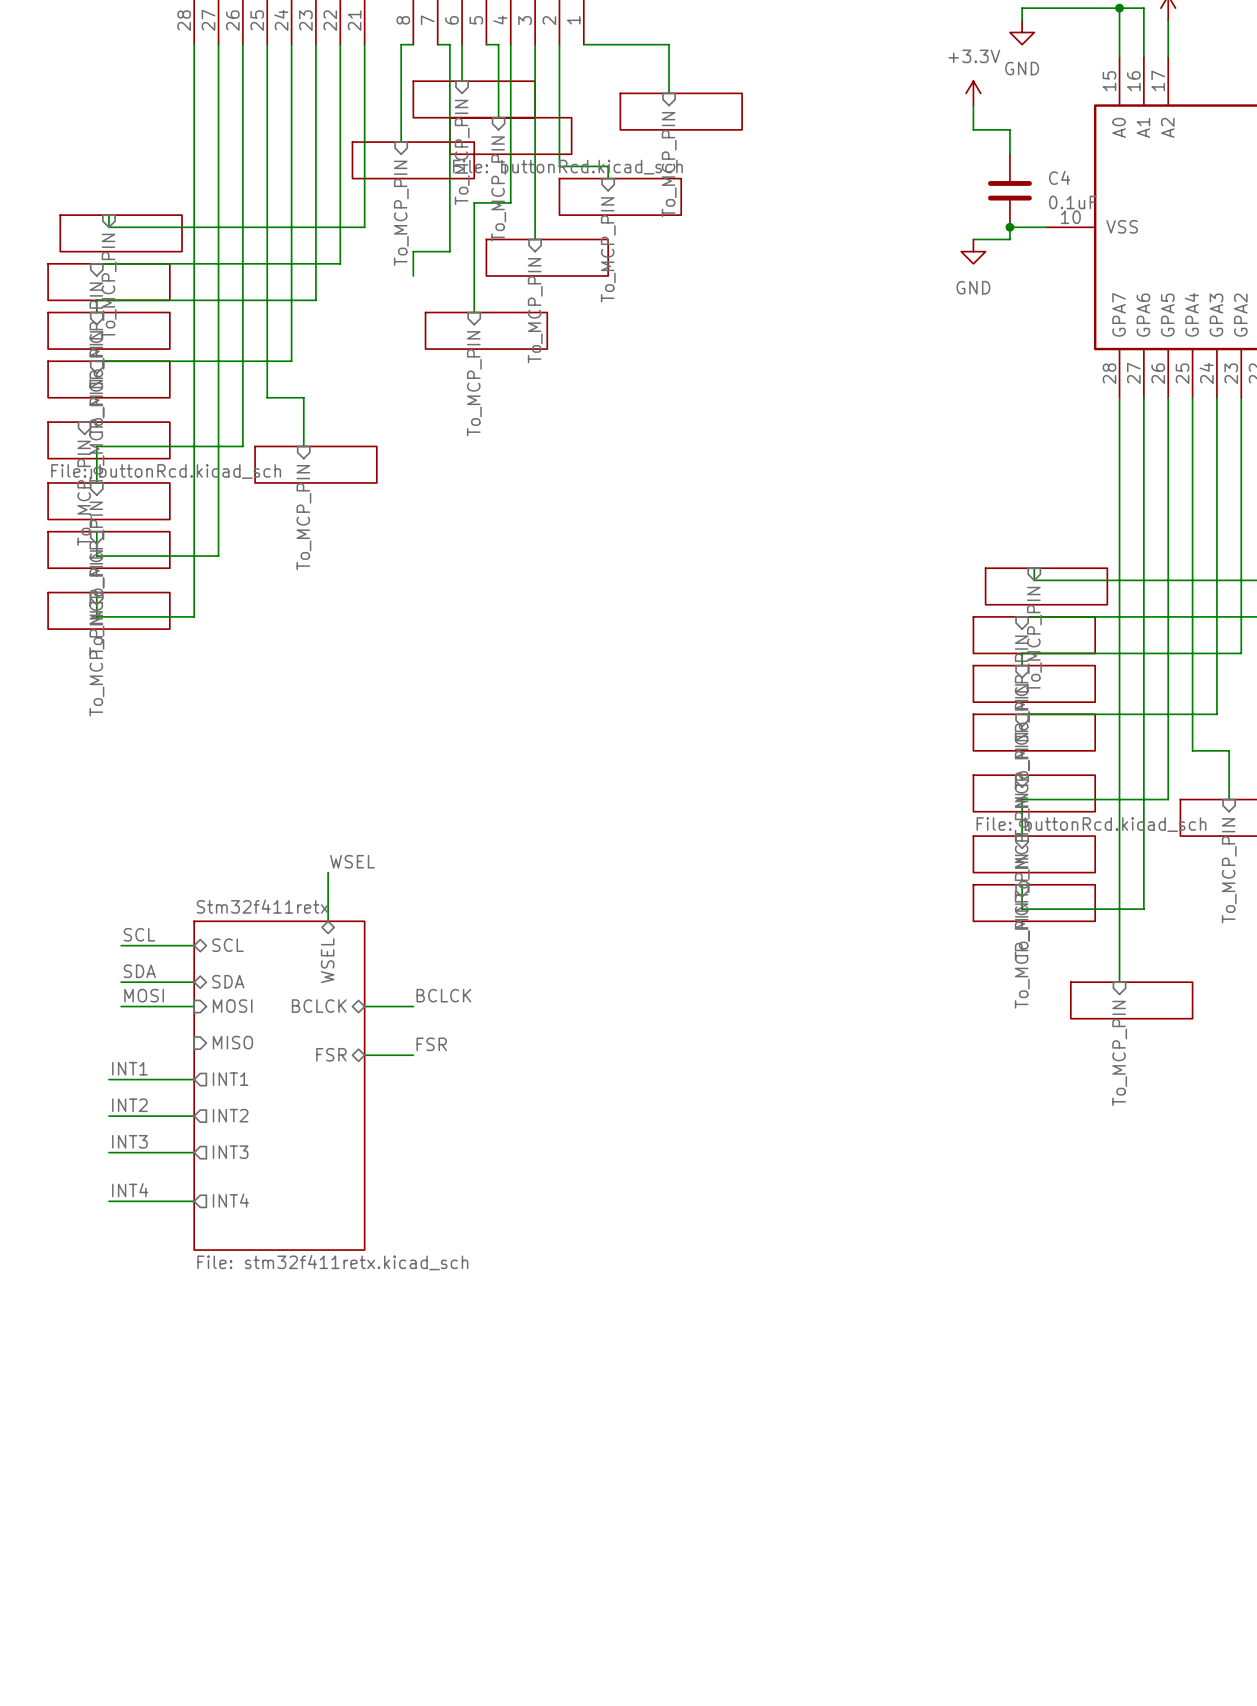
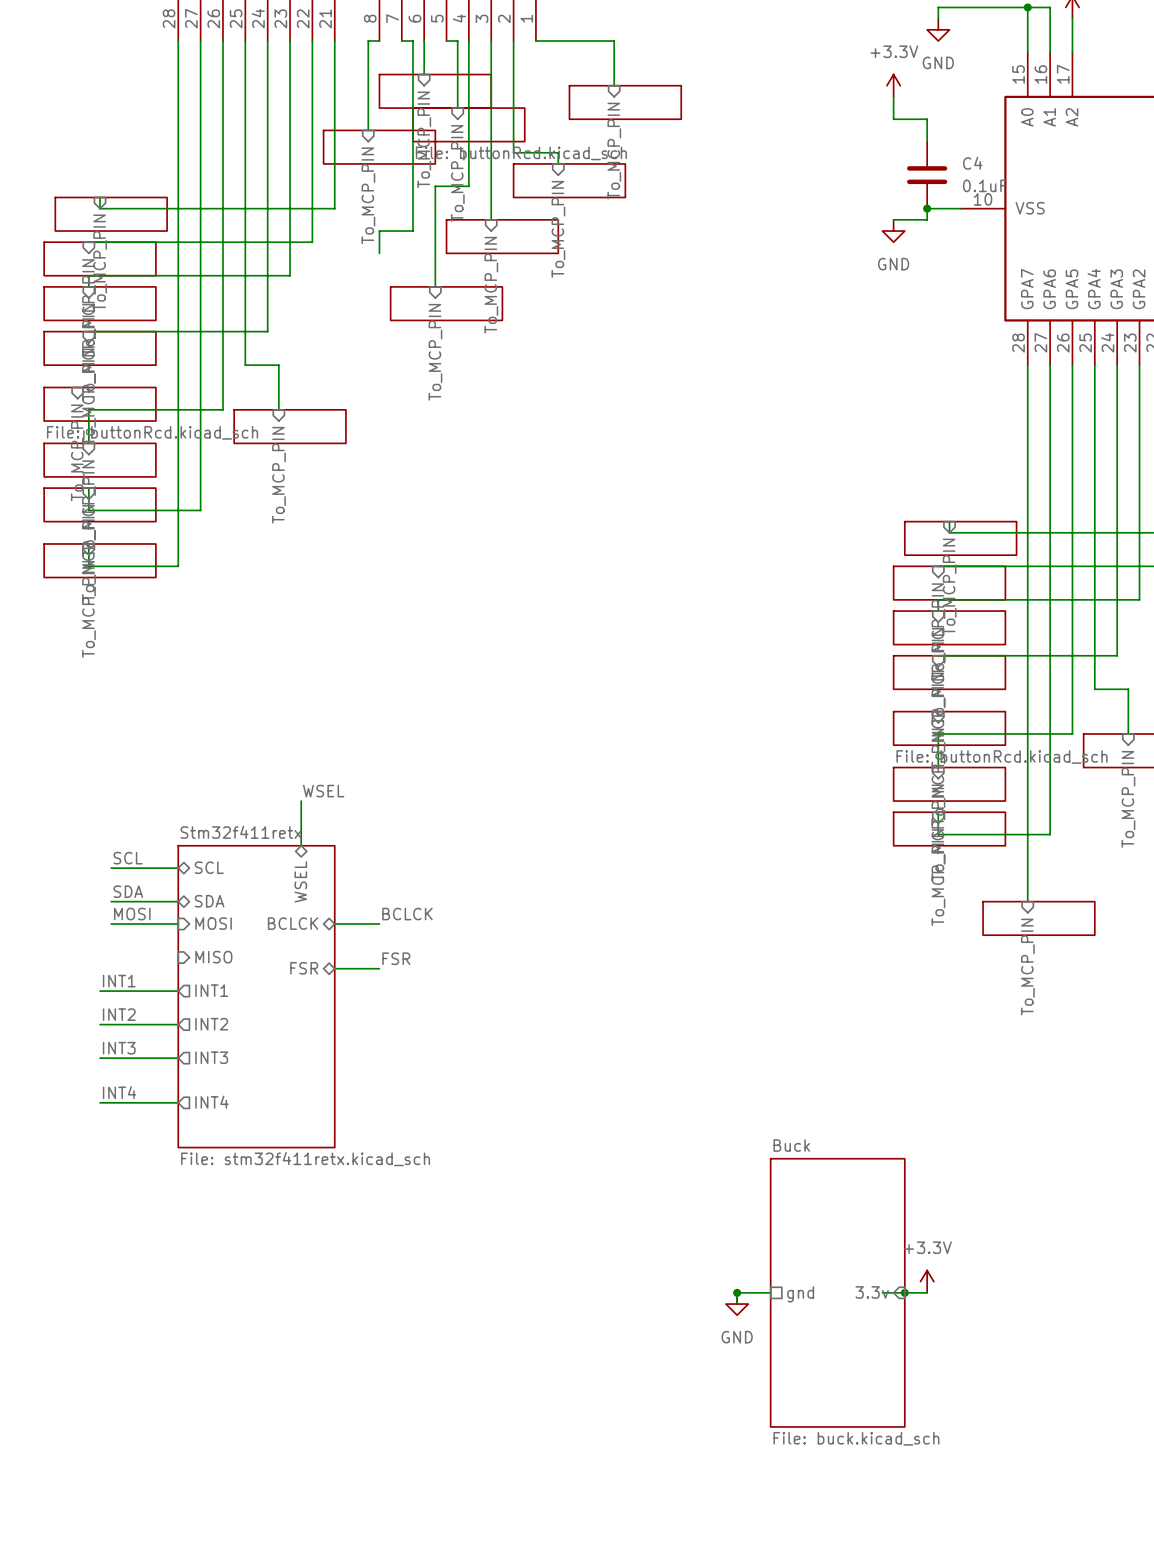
power symbol: none -> +3.3V (927, 1281)
sheet pin: none -> 3.3v (872, 1292)
junction: none -> (737, 1292)
wire: none -> (770, 1292) (737, 1292) (737, 1304)
sheet Buck: none -> File: buck.kicad_sch (837, 1292)
wire: none -> (882, 1292) (927, 1292)
junction: none -> (904, 1292)
sheet pin: none -> gnd (800, 1294)
power symbol: none -> GND (737, 1304)

